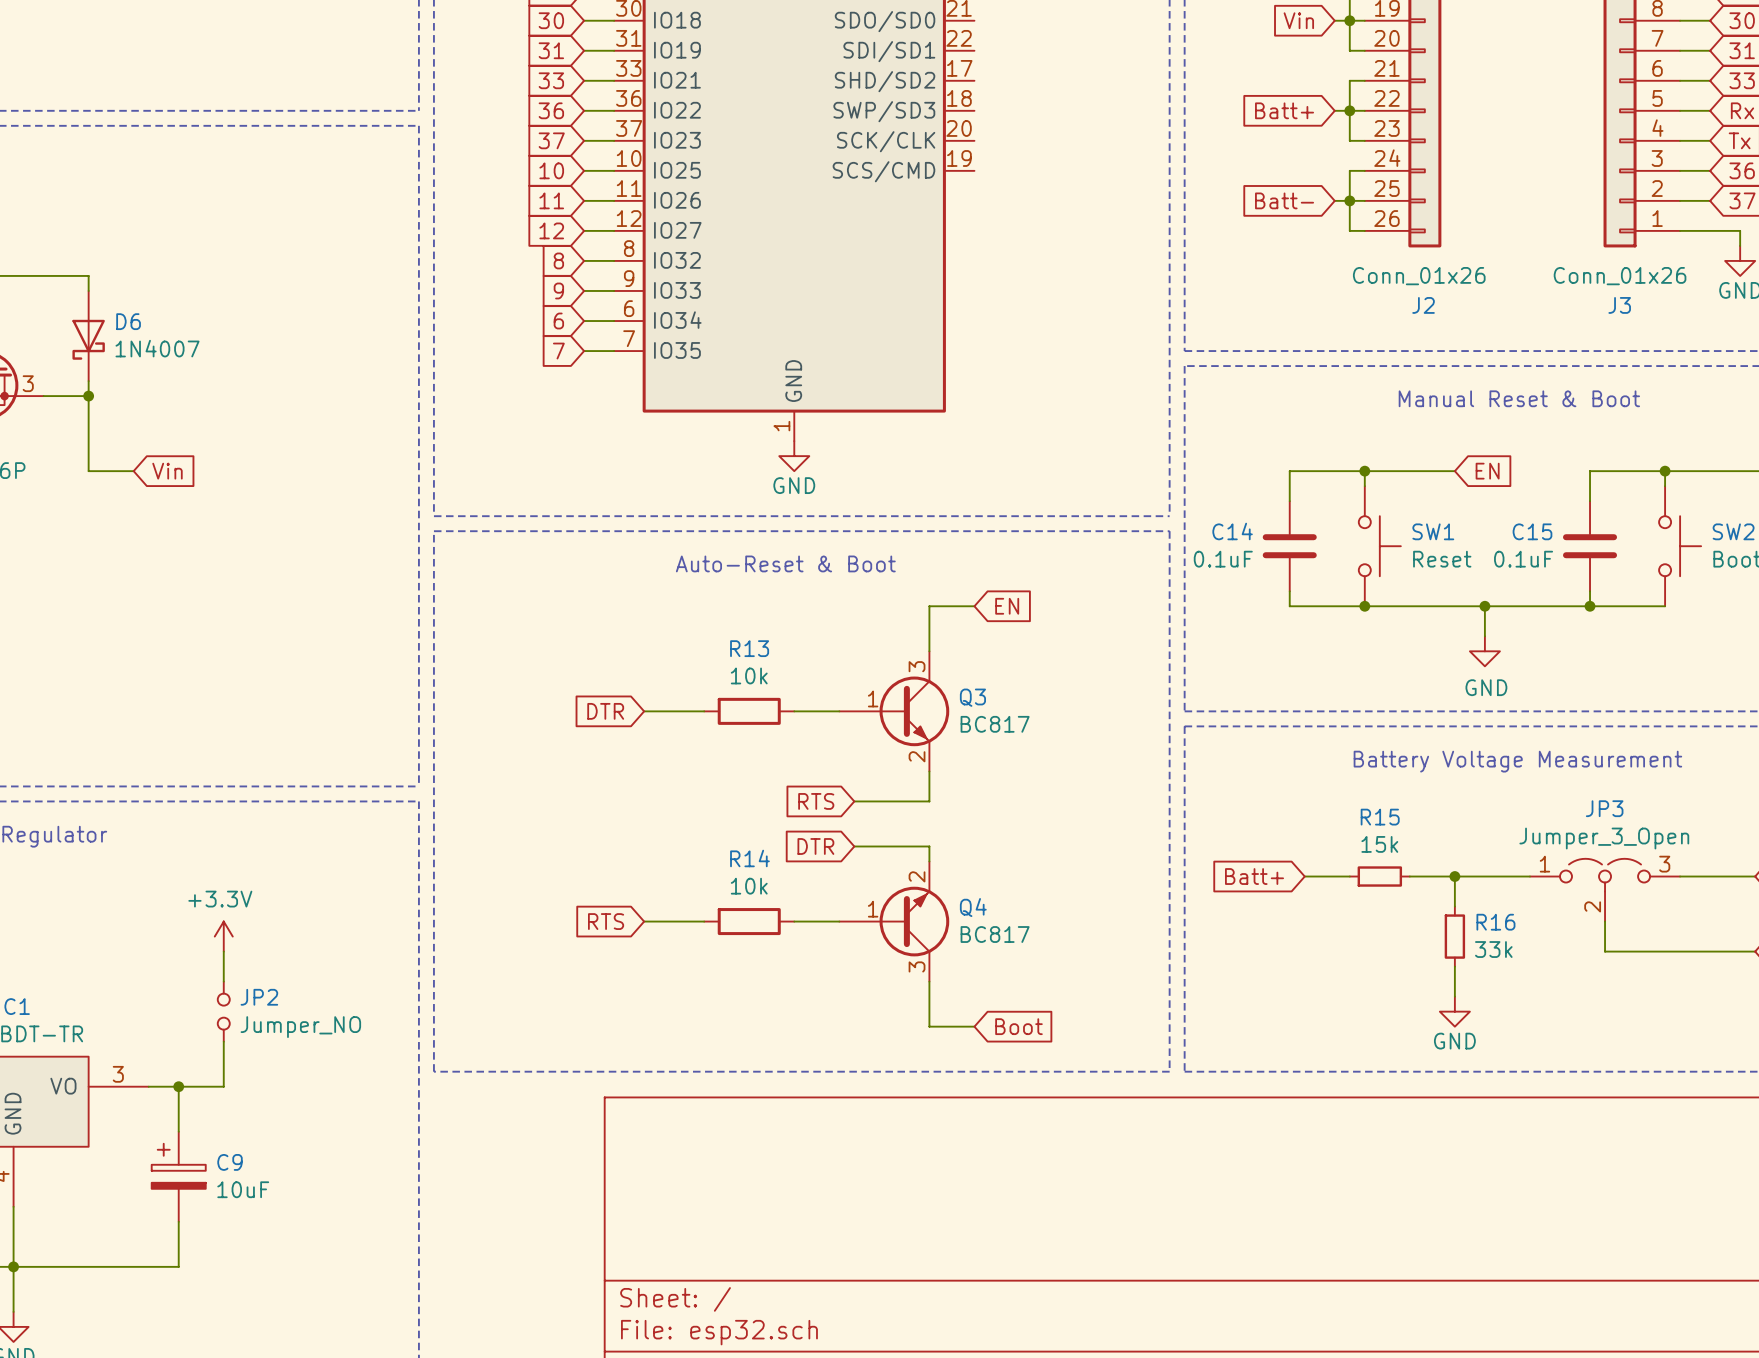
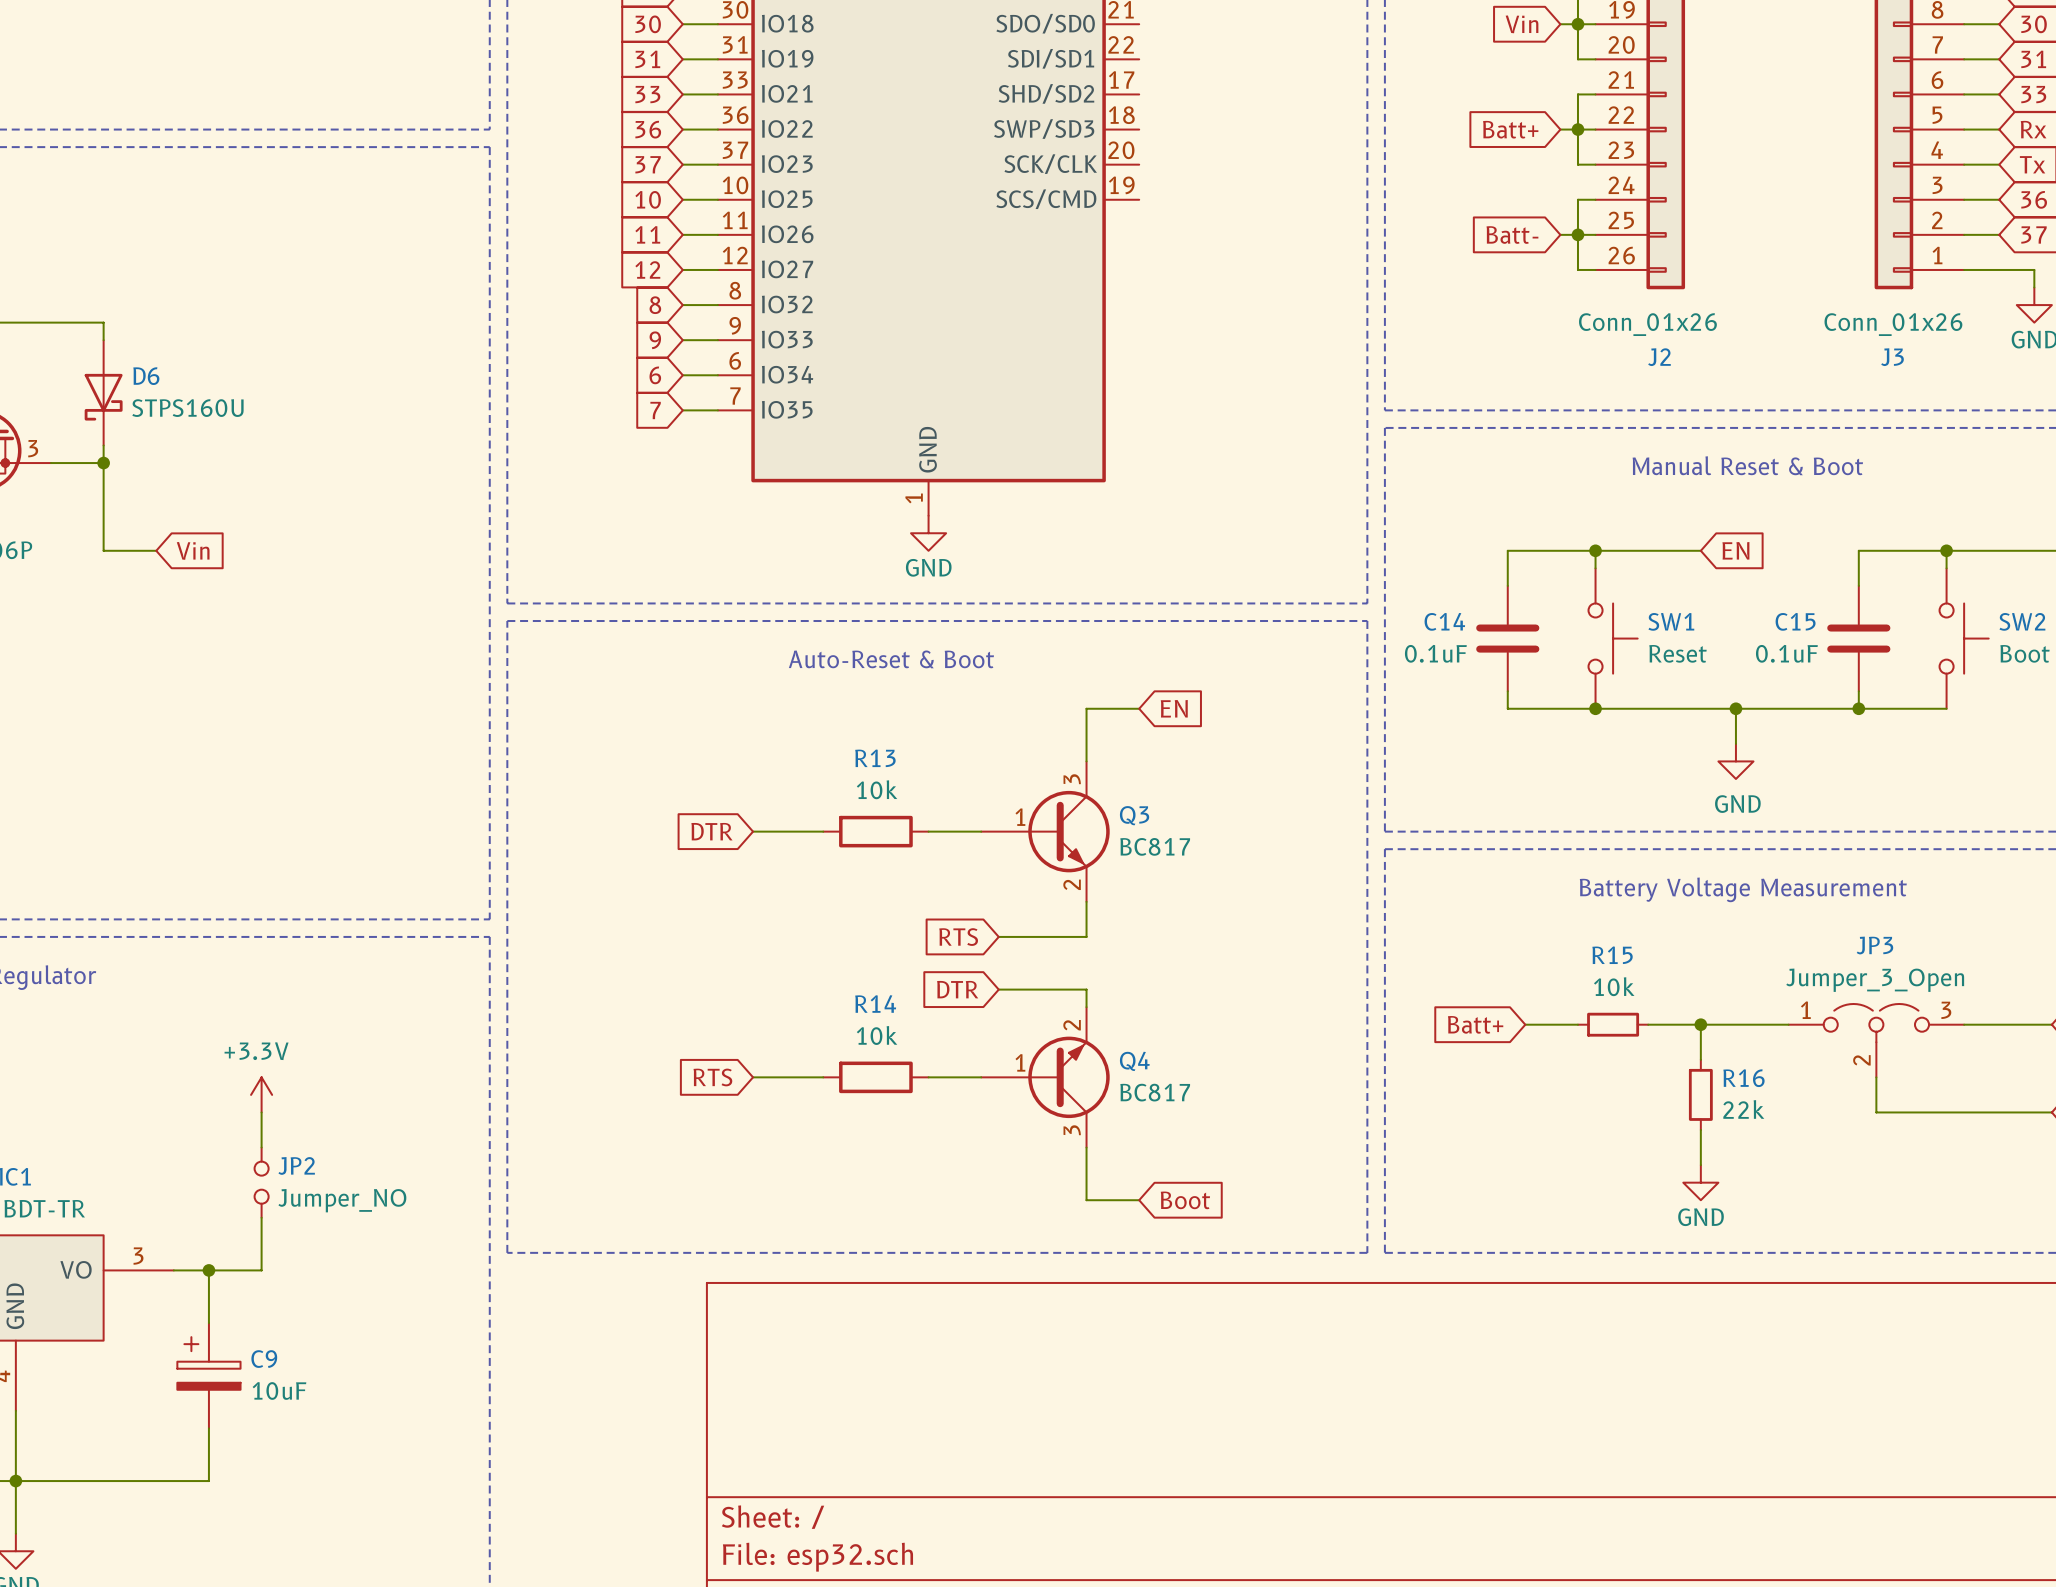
D6 value: 1N4007 (157, 348) -> STPS160U (187, 408)
R15 value: 15k (1379, 844) -> 10k (1614, 986)
R16 value: 33k (1493, 949) -> 22k (1743, 1109)

